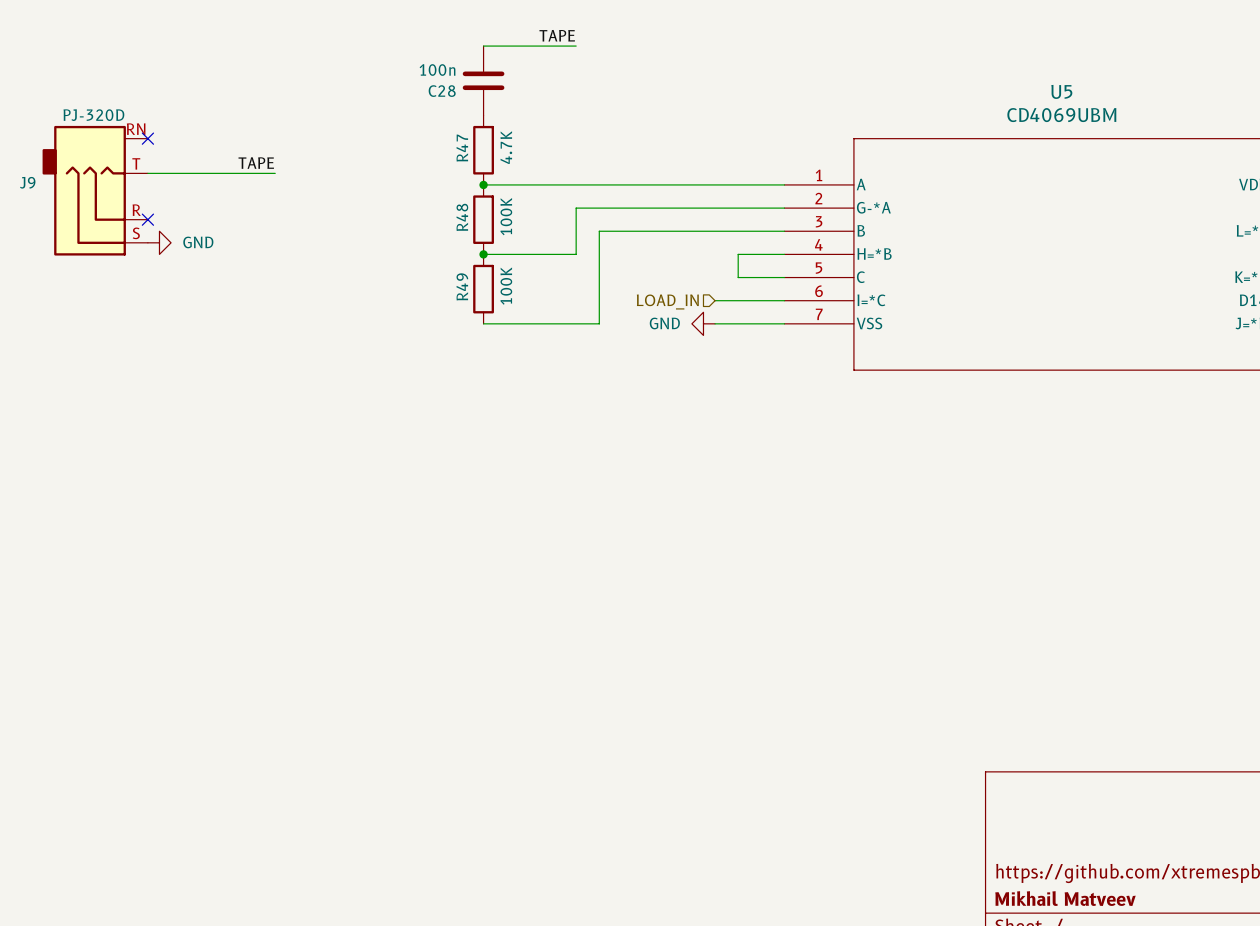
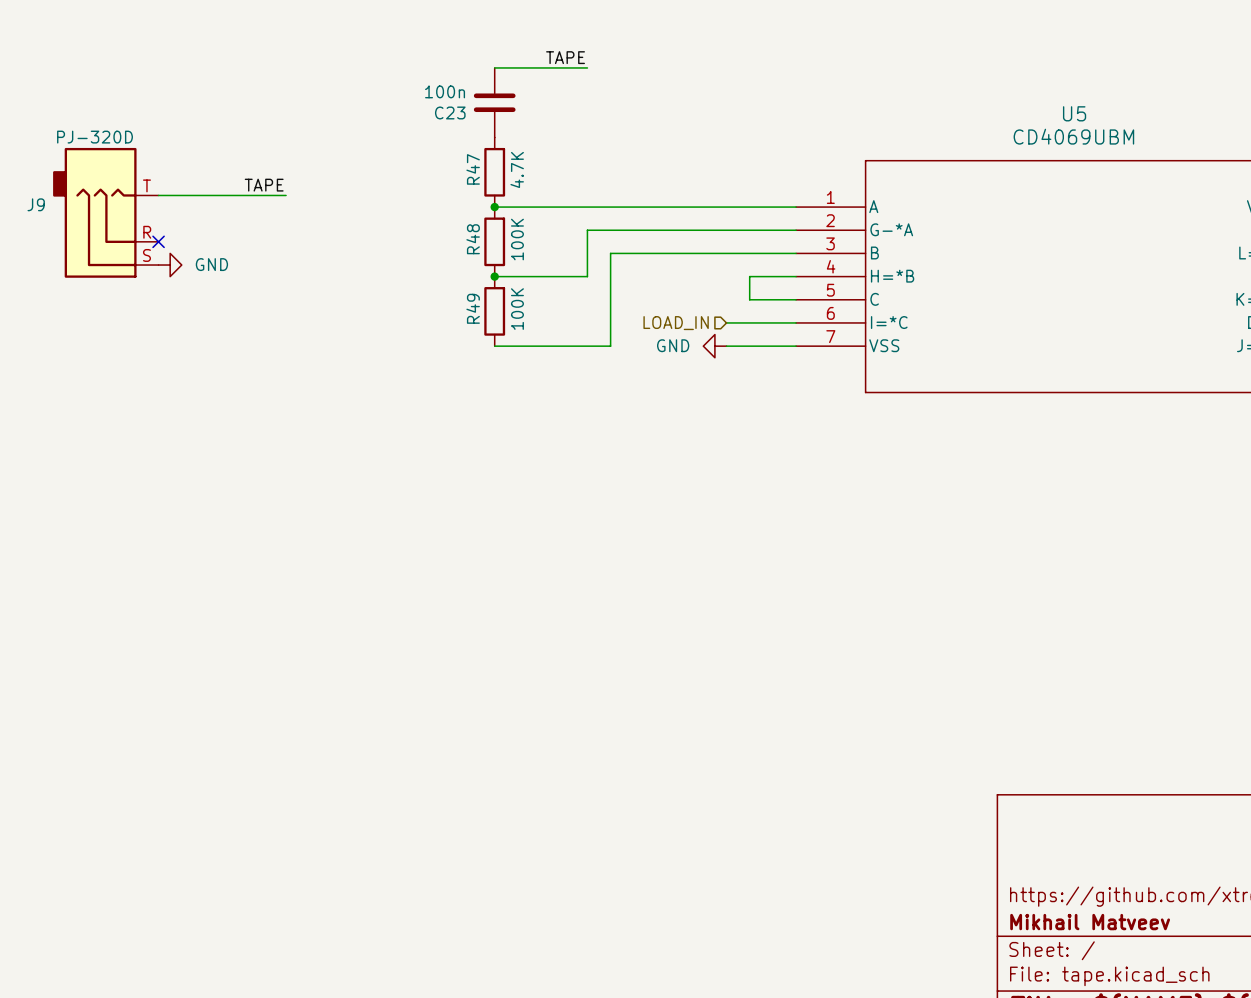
C28 name: C28 (442, 91) -> C23 (450, 112)
J9 symbol: [42, 125, 148, 256] -> [53, 147, 159, 278]
no-connect mark: (147, 138) -> none

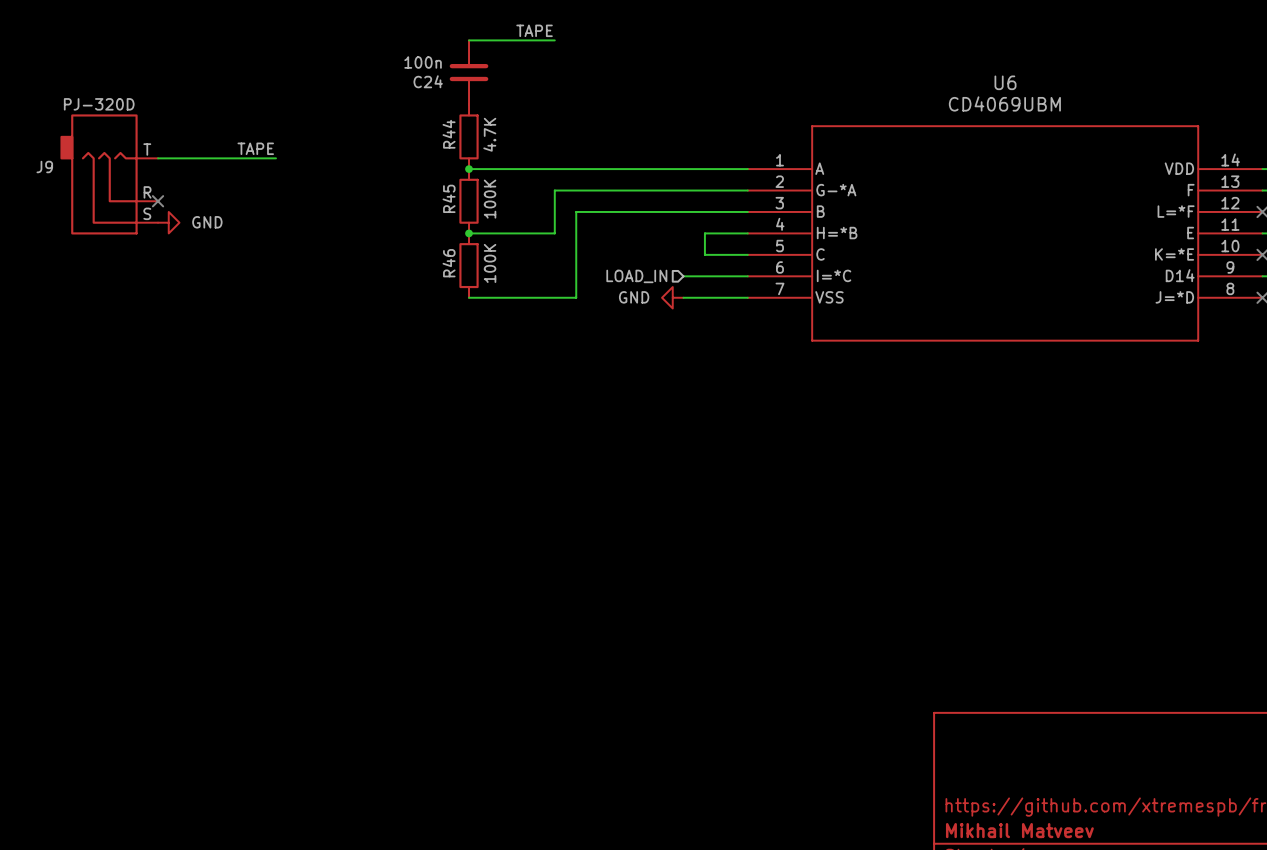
C23 name: C23 (450, 112) -> C24 (428, 81)
U5 name: U5 (1074, 113) -> U6 (1005, 82)
R47 name: R47 (473, 169) -> R44 (449, 134)
R48 name: R48 (473, 239) -> R45 (449, 198)
R49 name: R49 (473, 308) -> R46 (449, 263)

